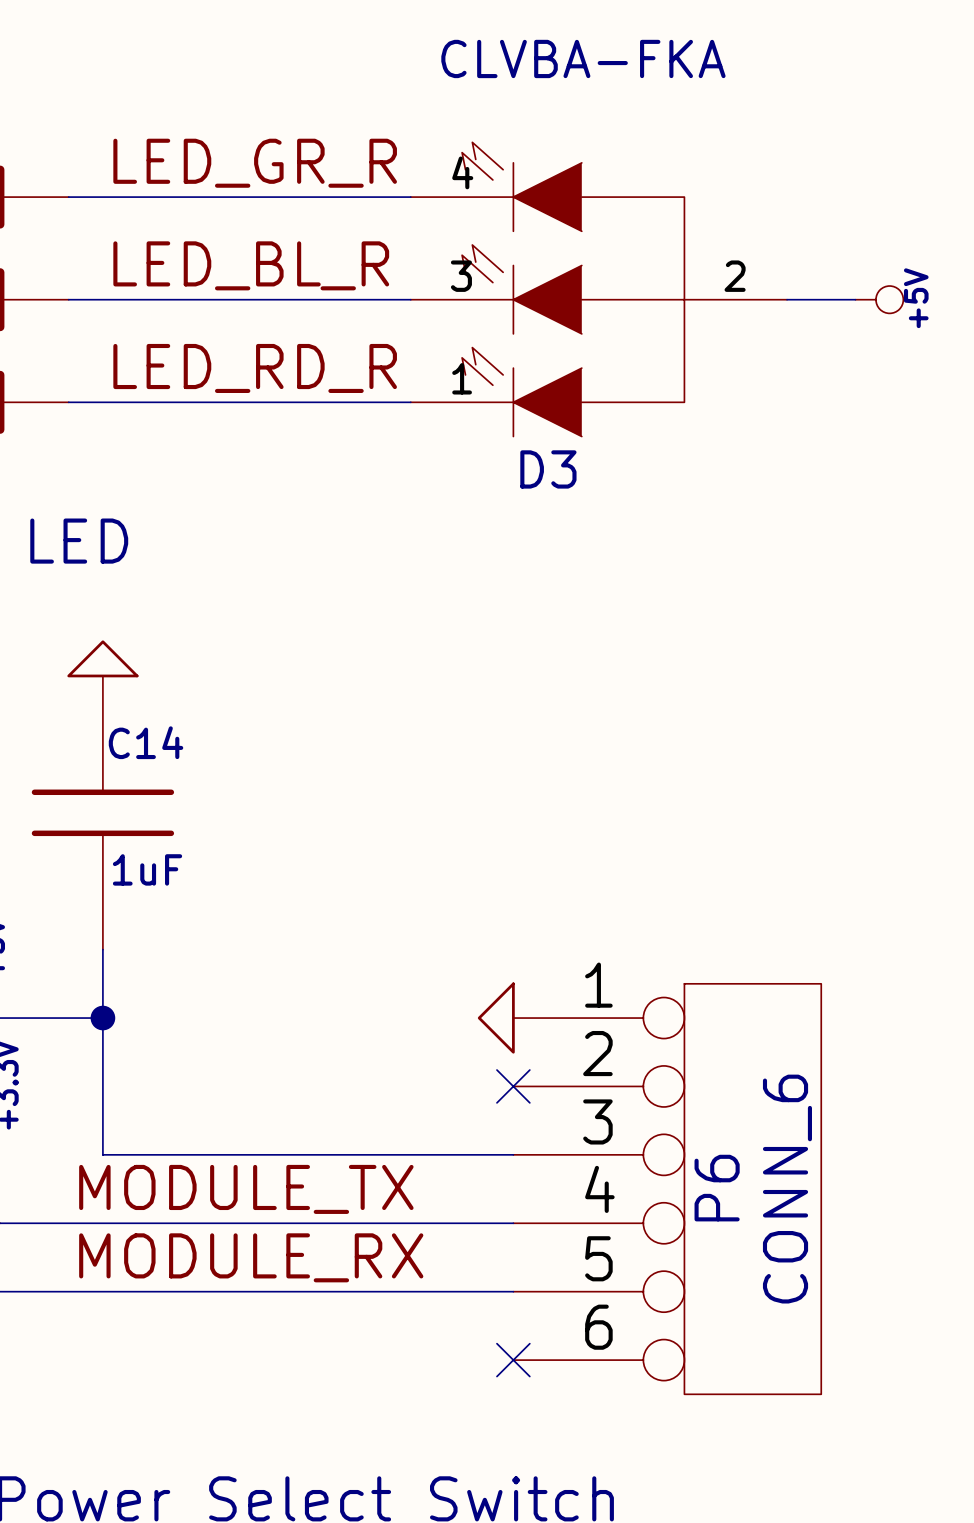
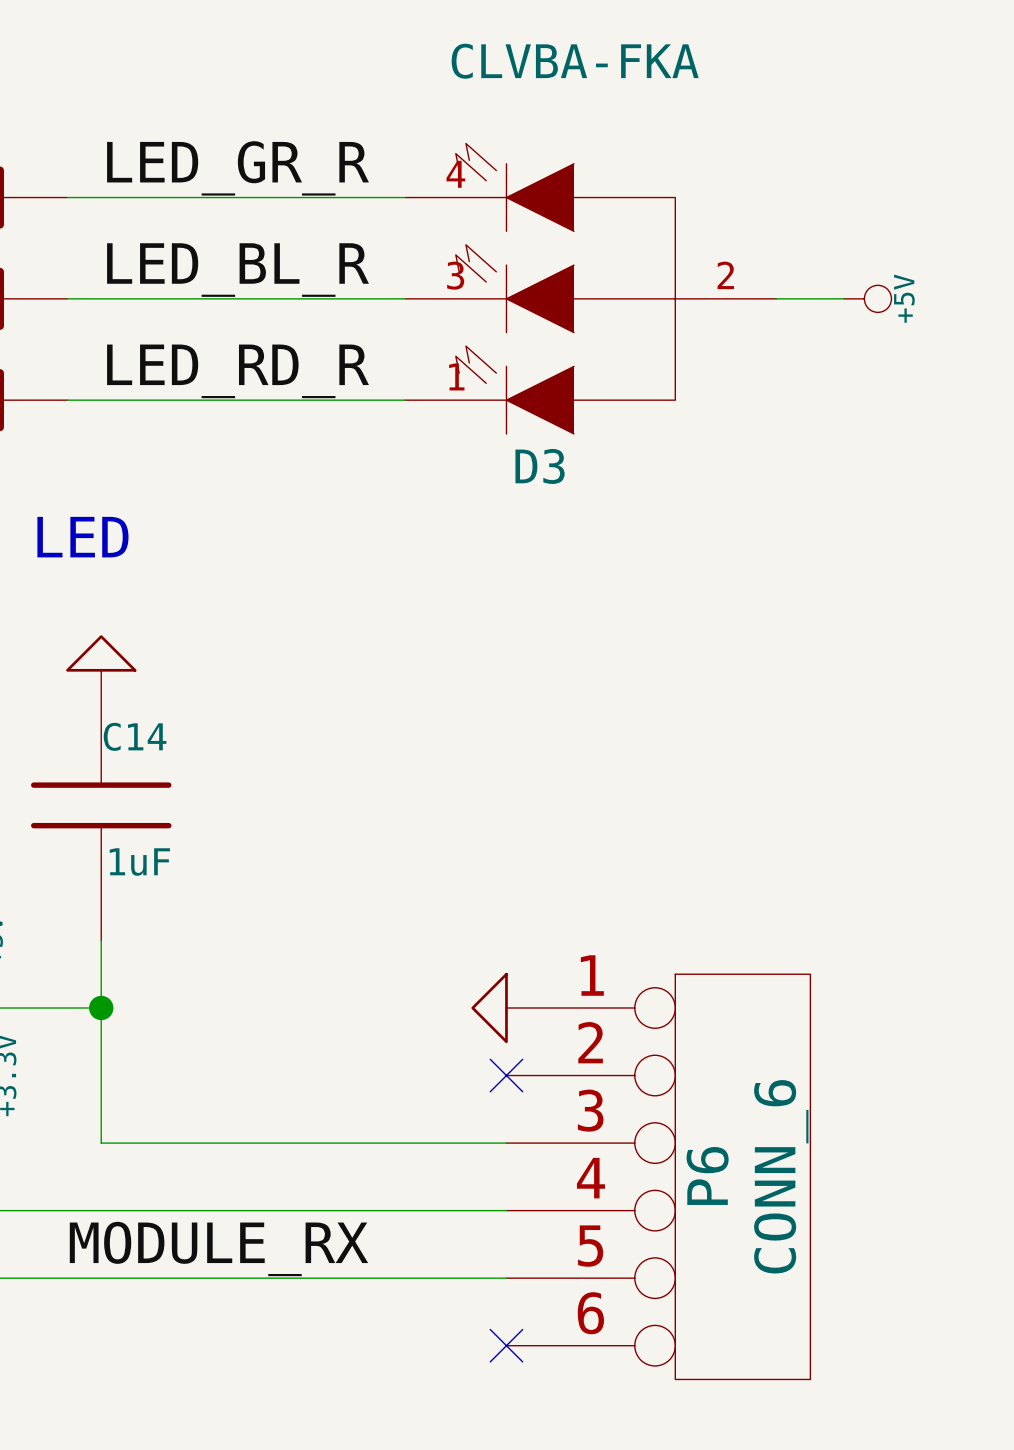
label: MODULE_TX (246, 1189) -> none

